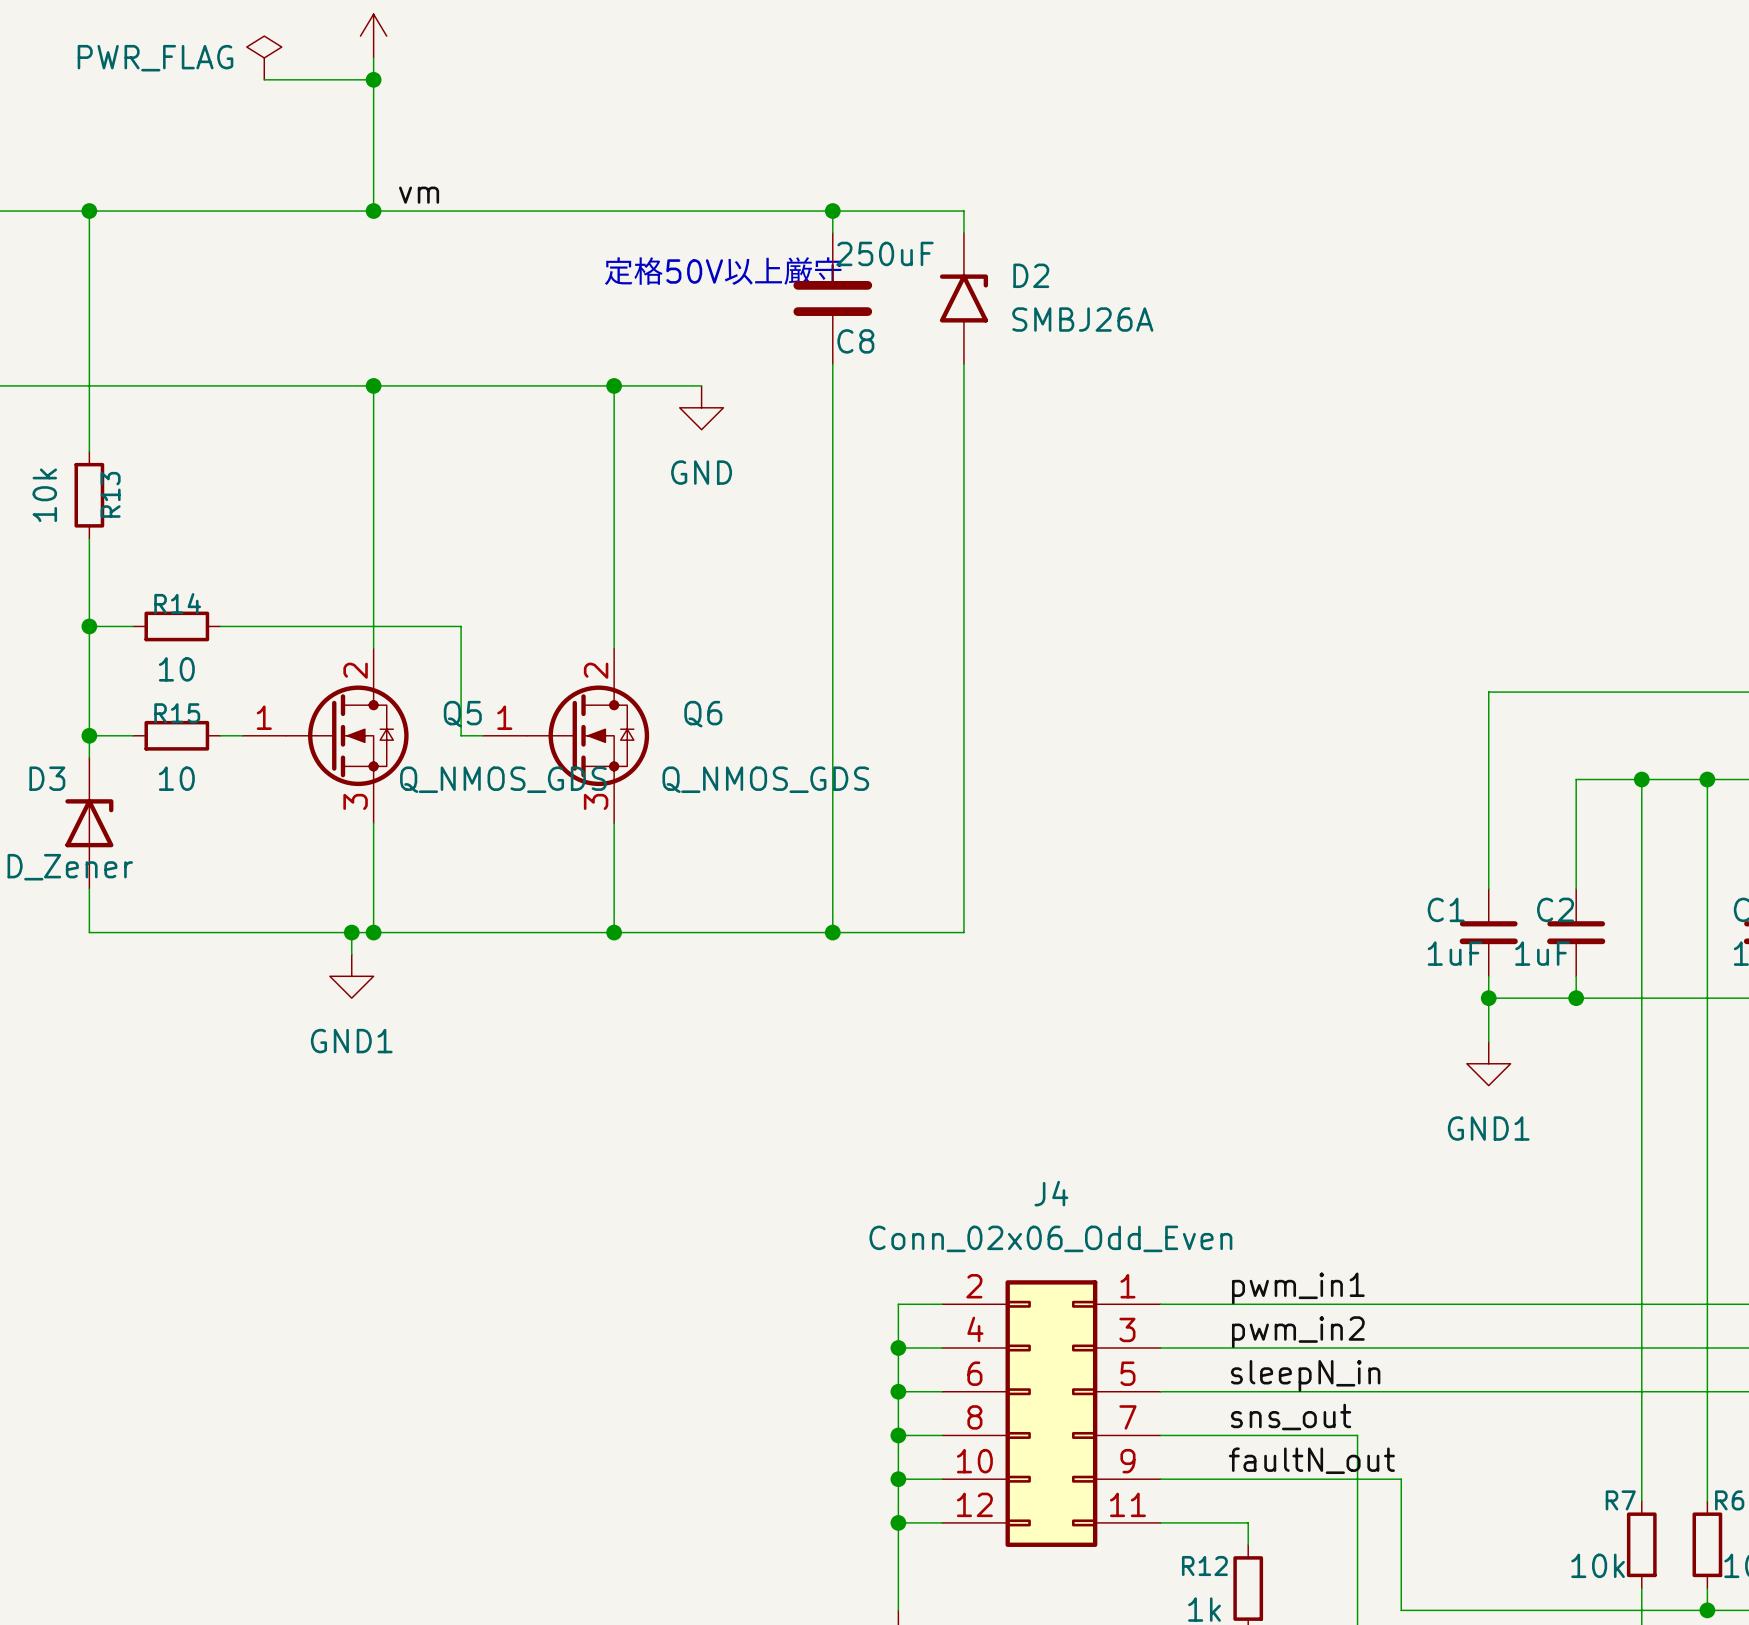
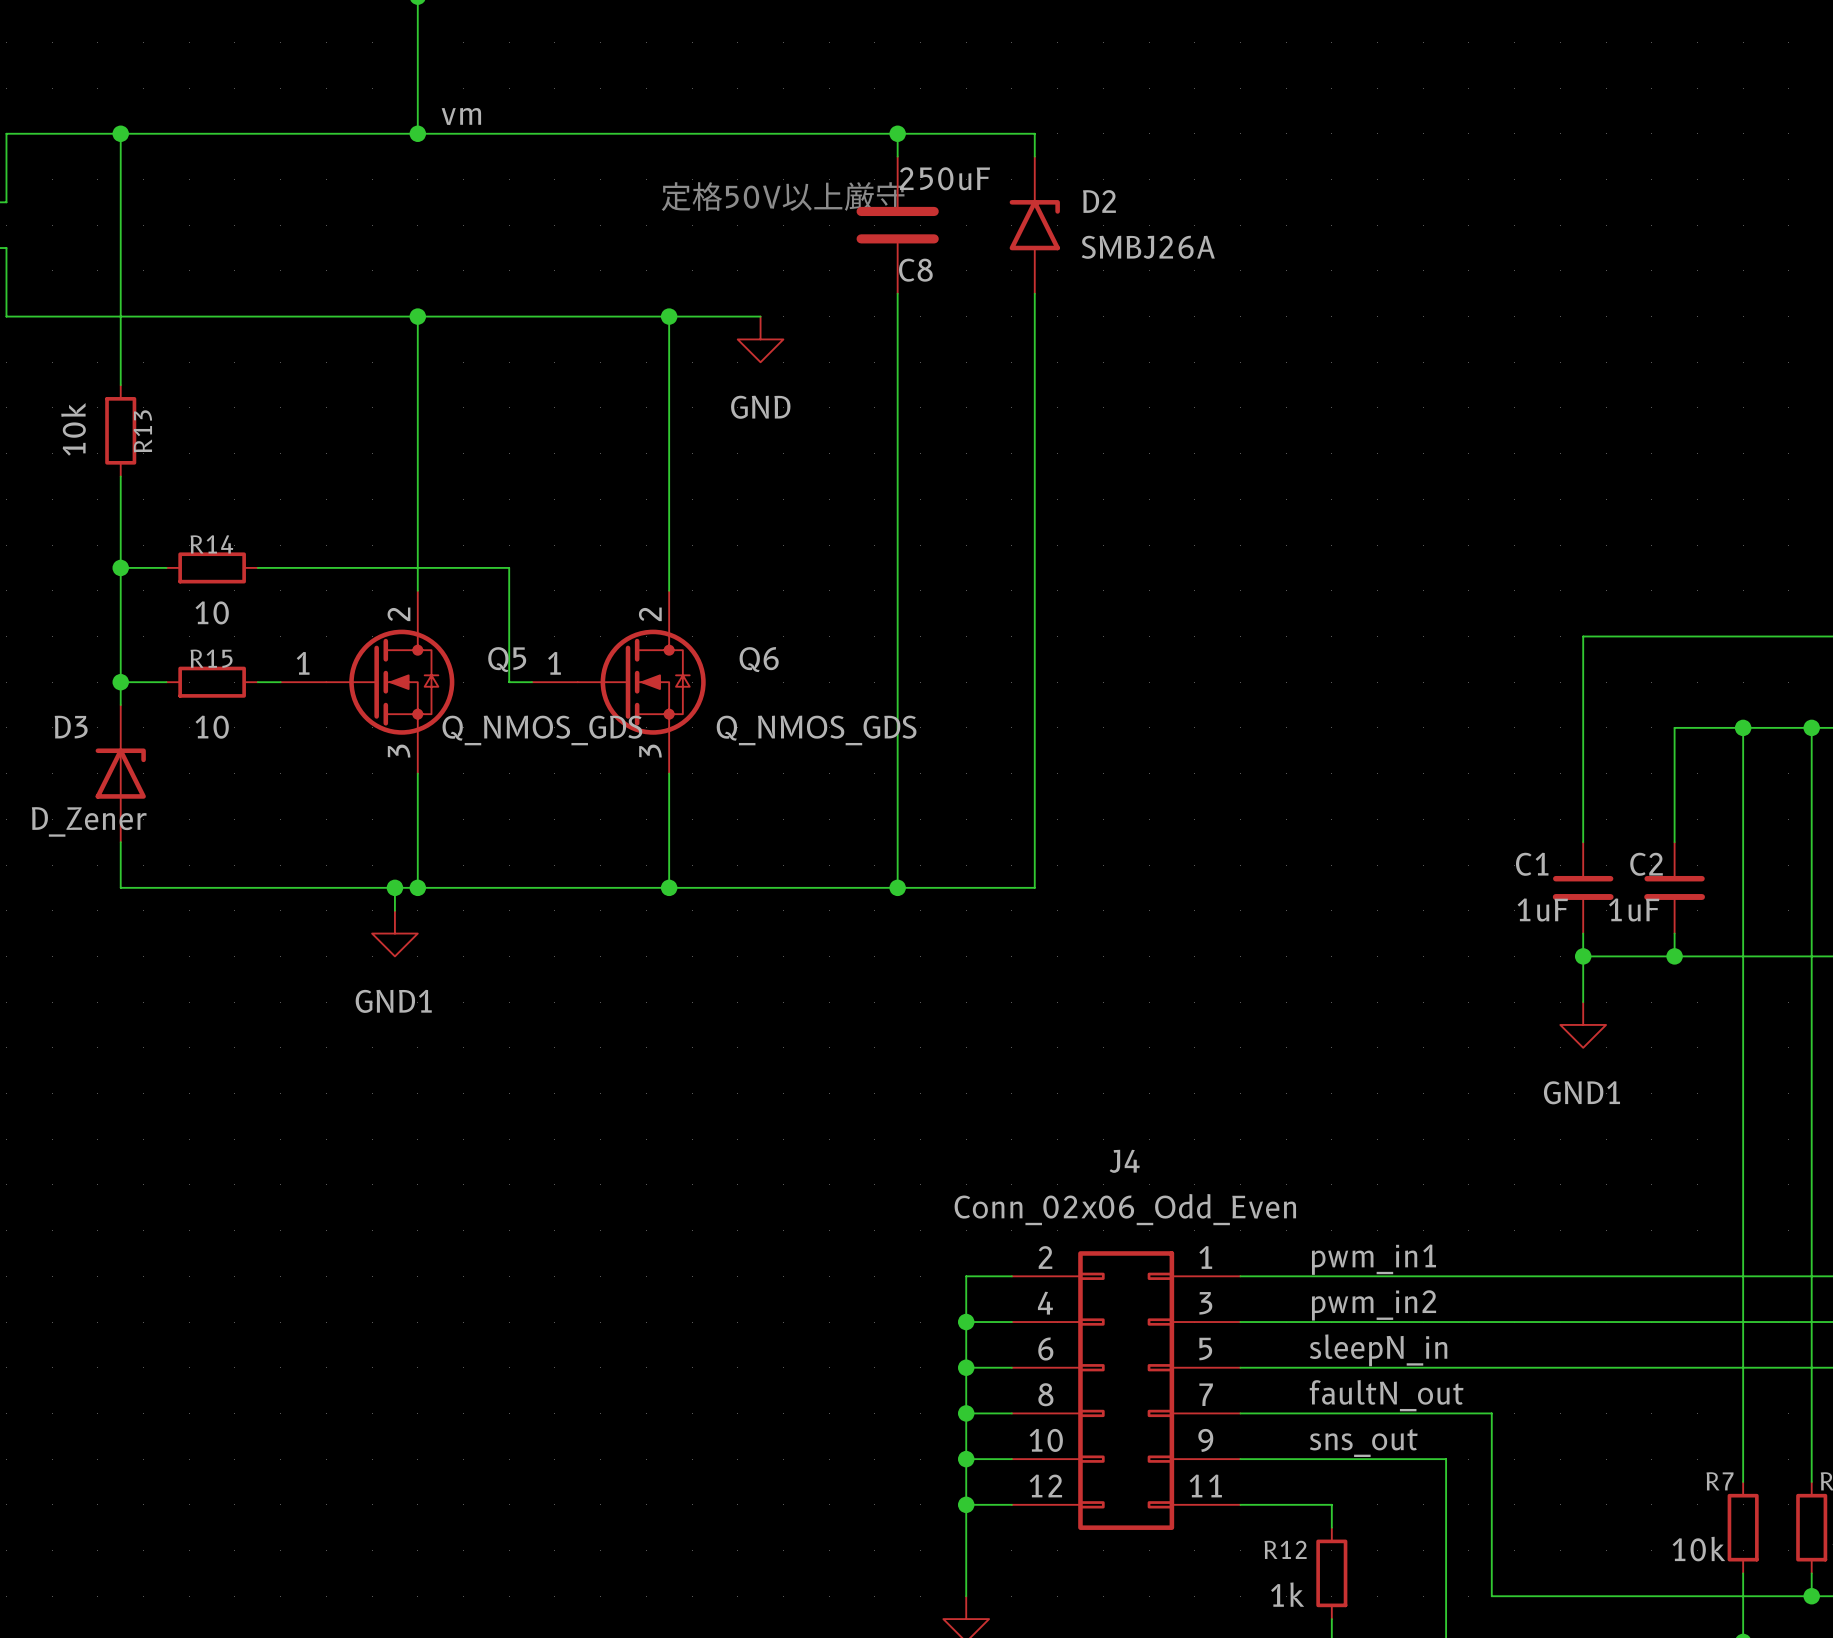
label: sns_out (1291, 1416) -> faultN_out (1386, 1395)
wire: (1357, 1435) (1357, 1479) (1401, 1479) -> (1446, 1413) (1491, 1413) (1491, 1459)
label: faultN_out (1311, 1460) -> sns_out (1363, 1442)

